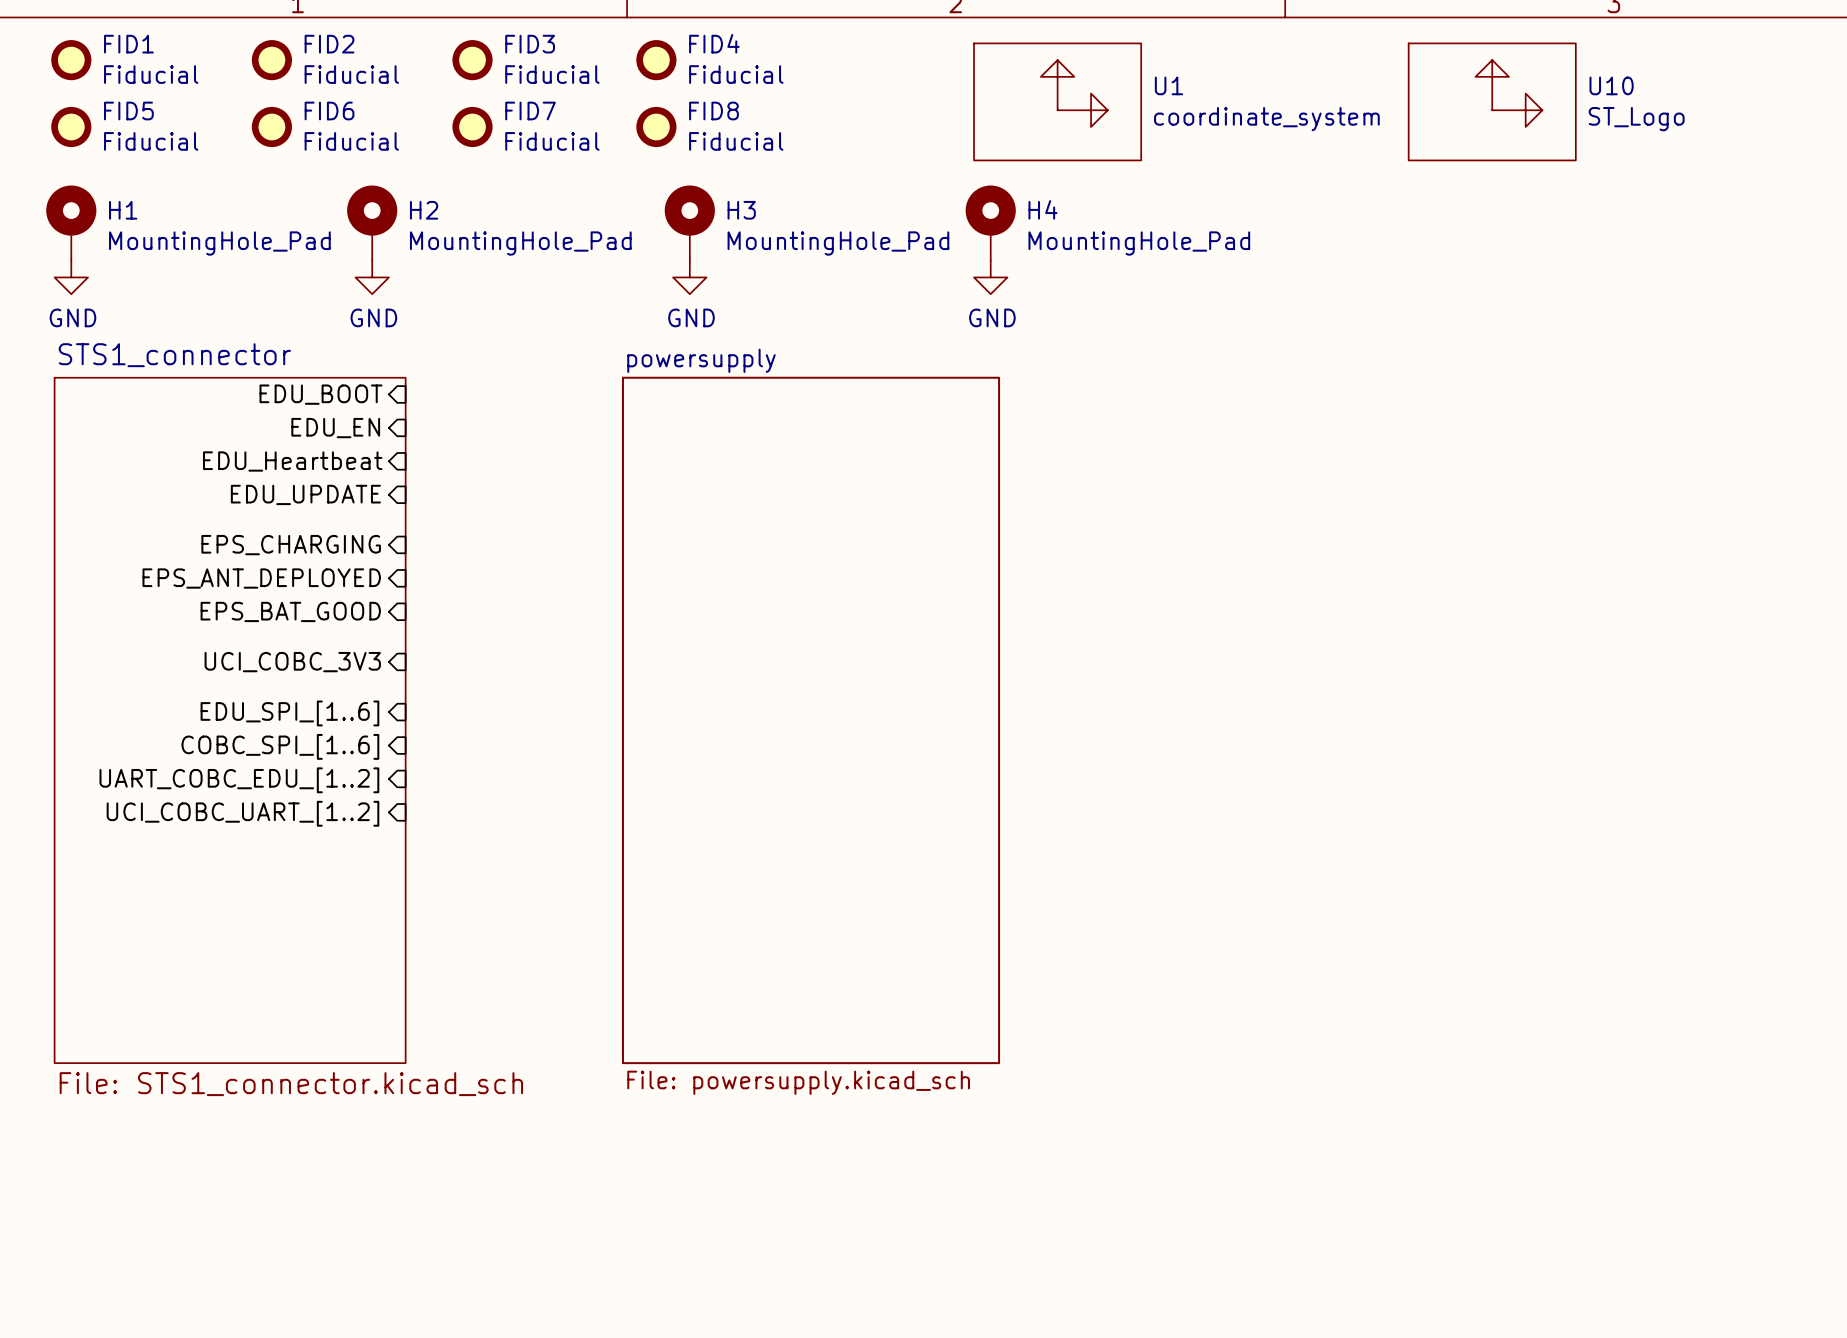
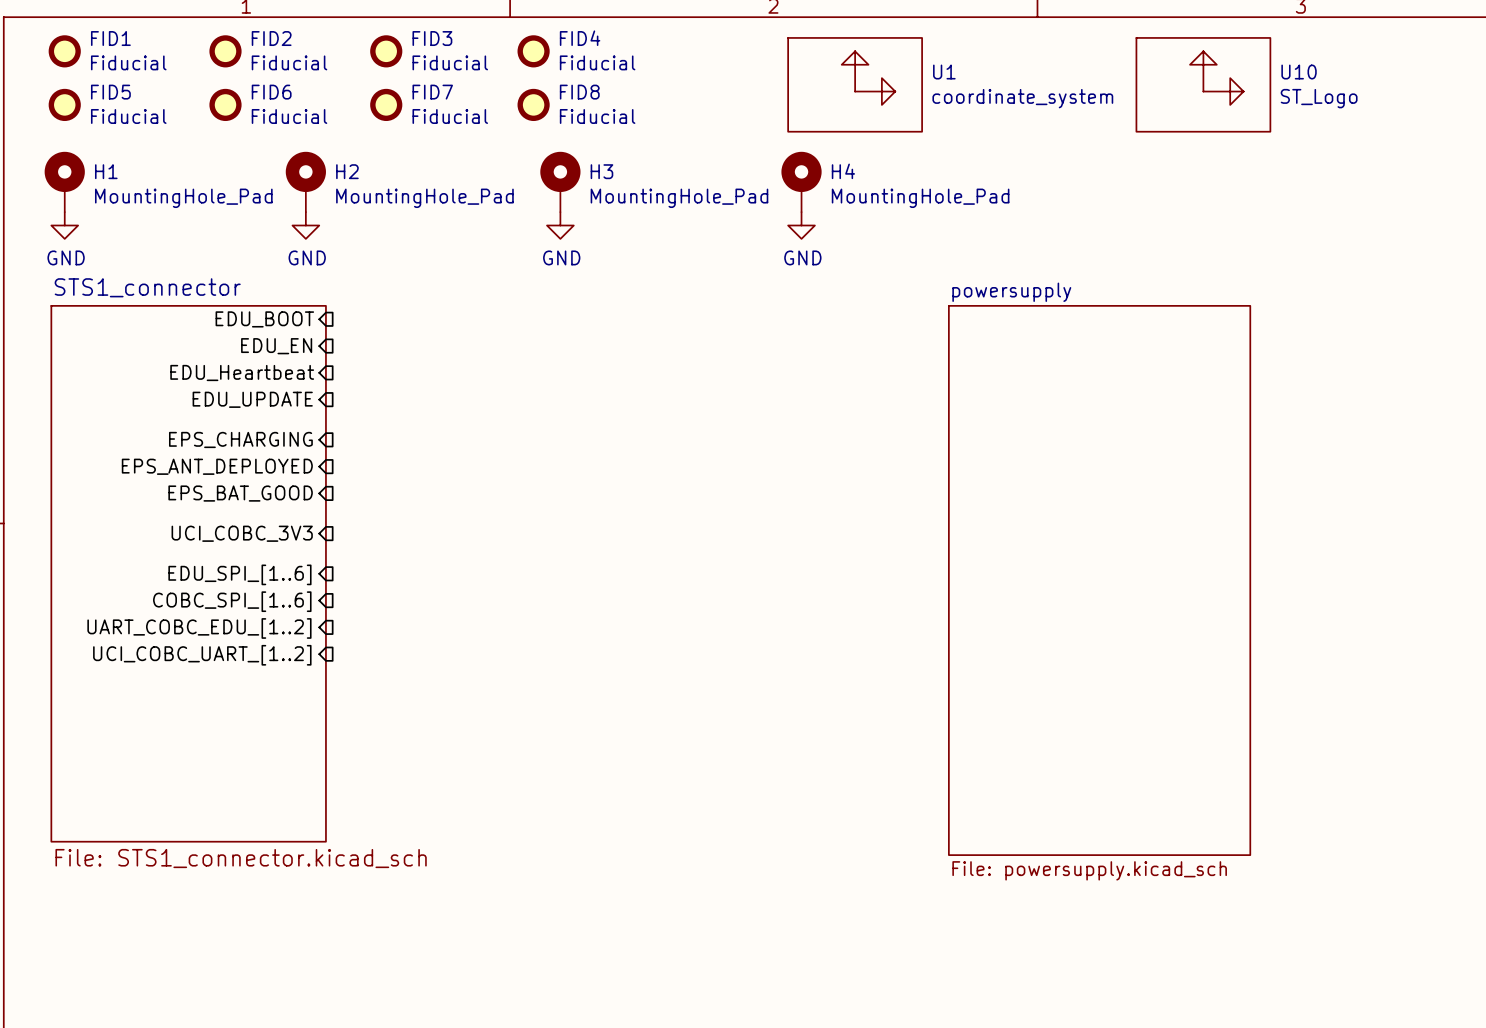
sheet STS1_connector shape: [54, 377, 406, 1064] -> [51, 305, 326, 842]
sheet powersupply: File: powersupply.kicad_sch (811, 720) -> none
sheet powersupply: none -> File: powersupply.kicad_sch (1099, 580)

